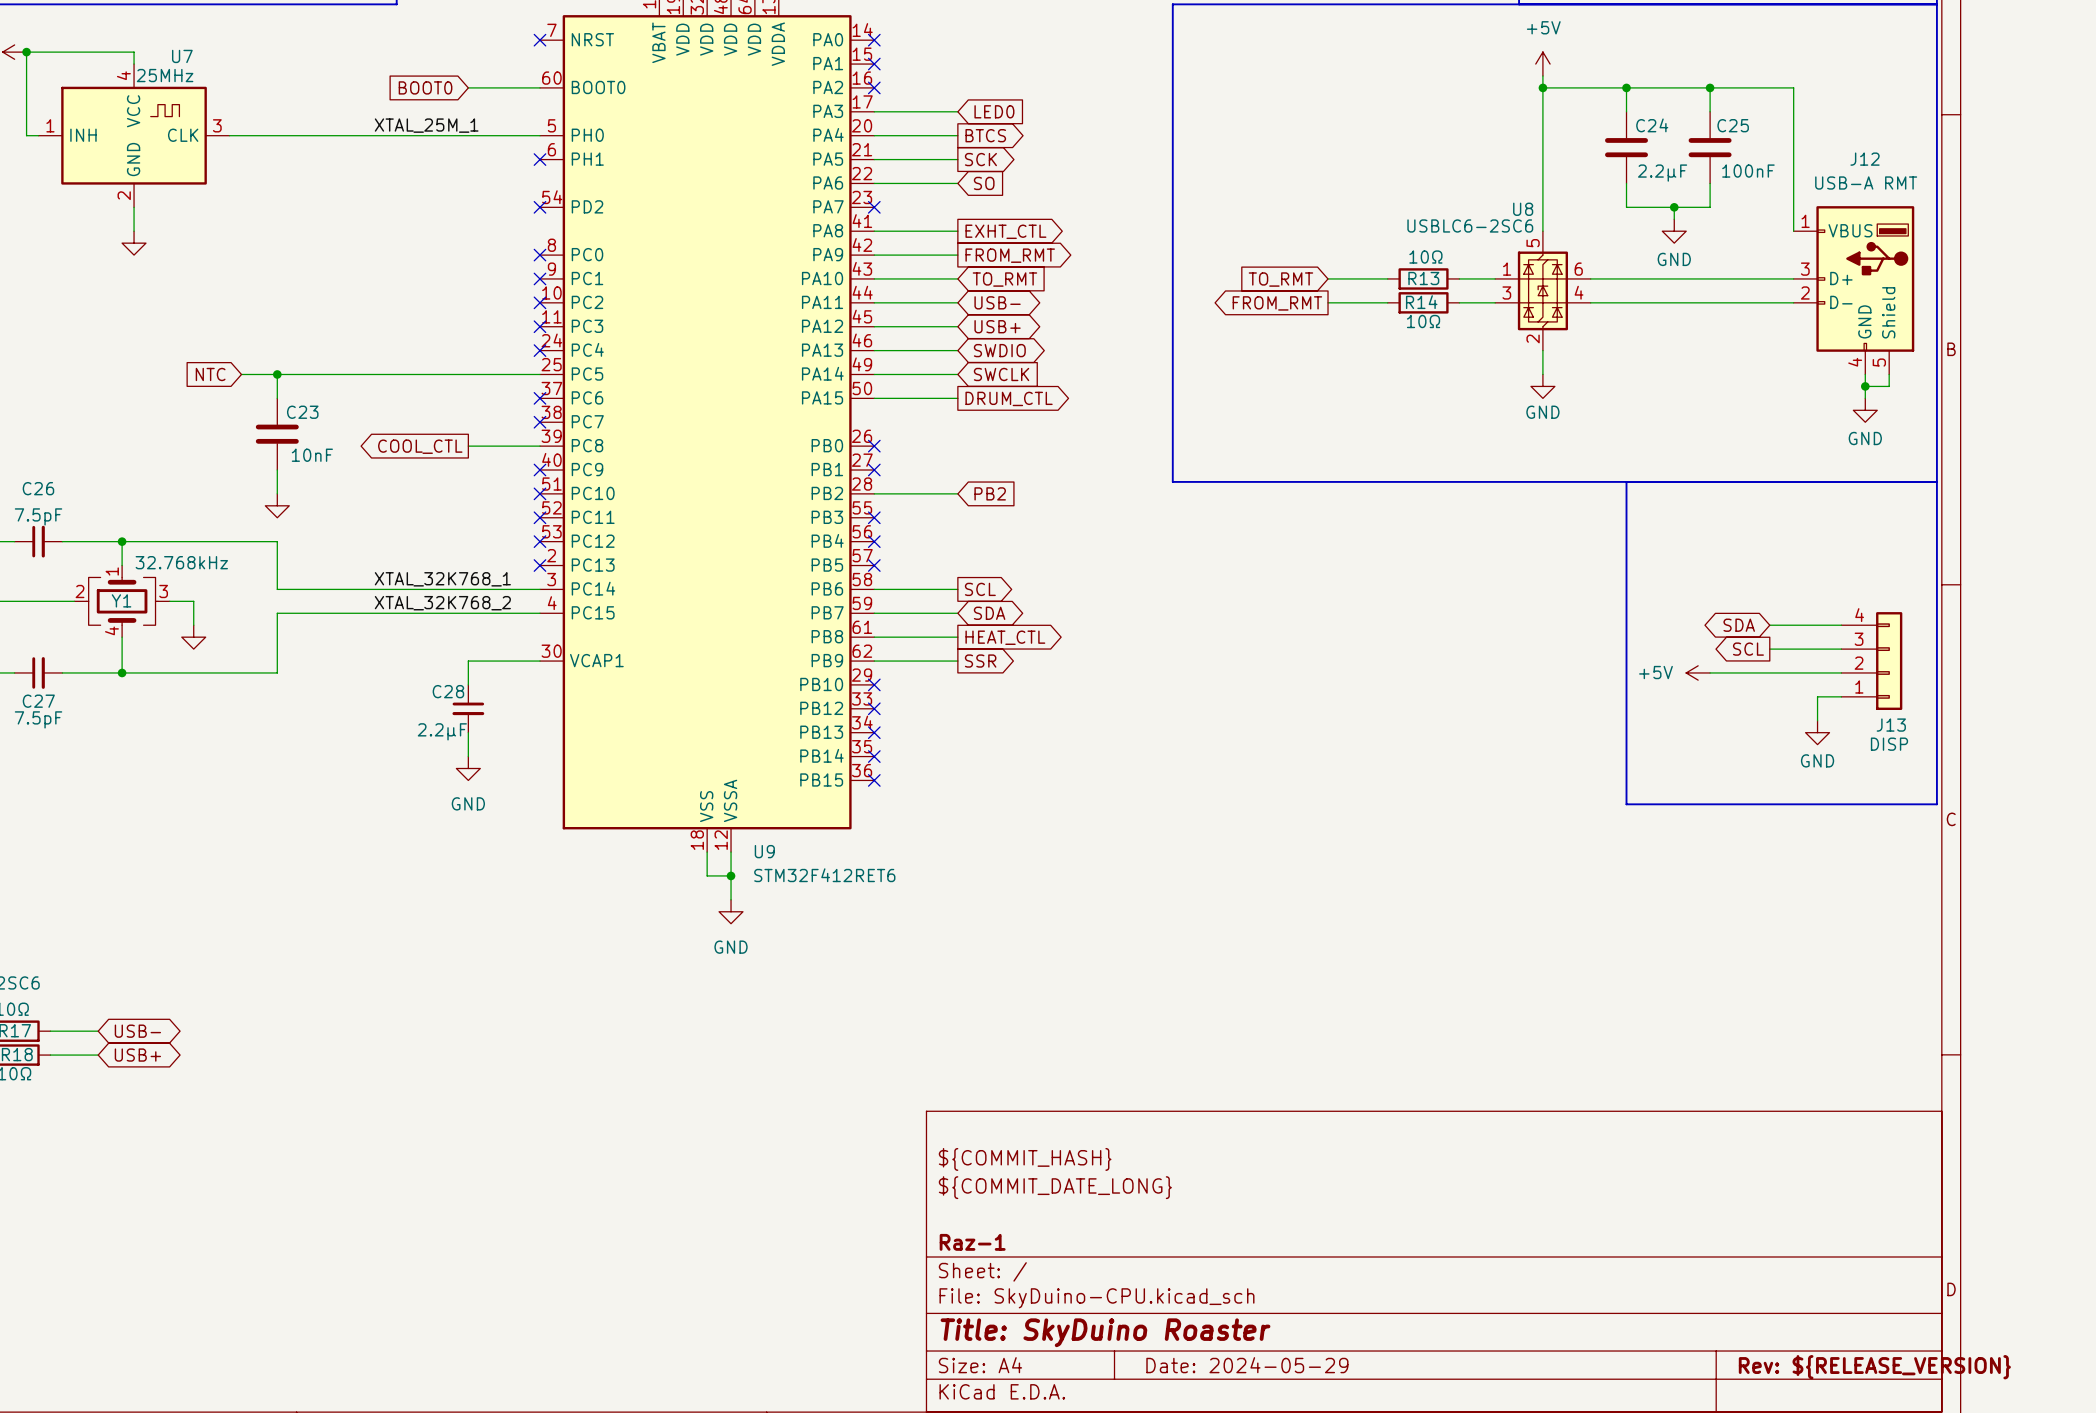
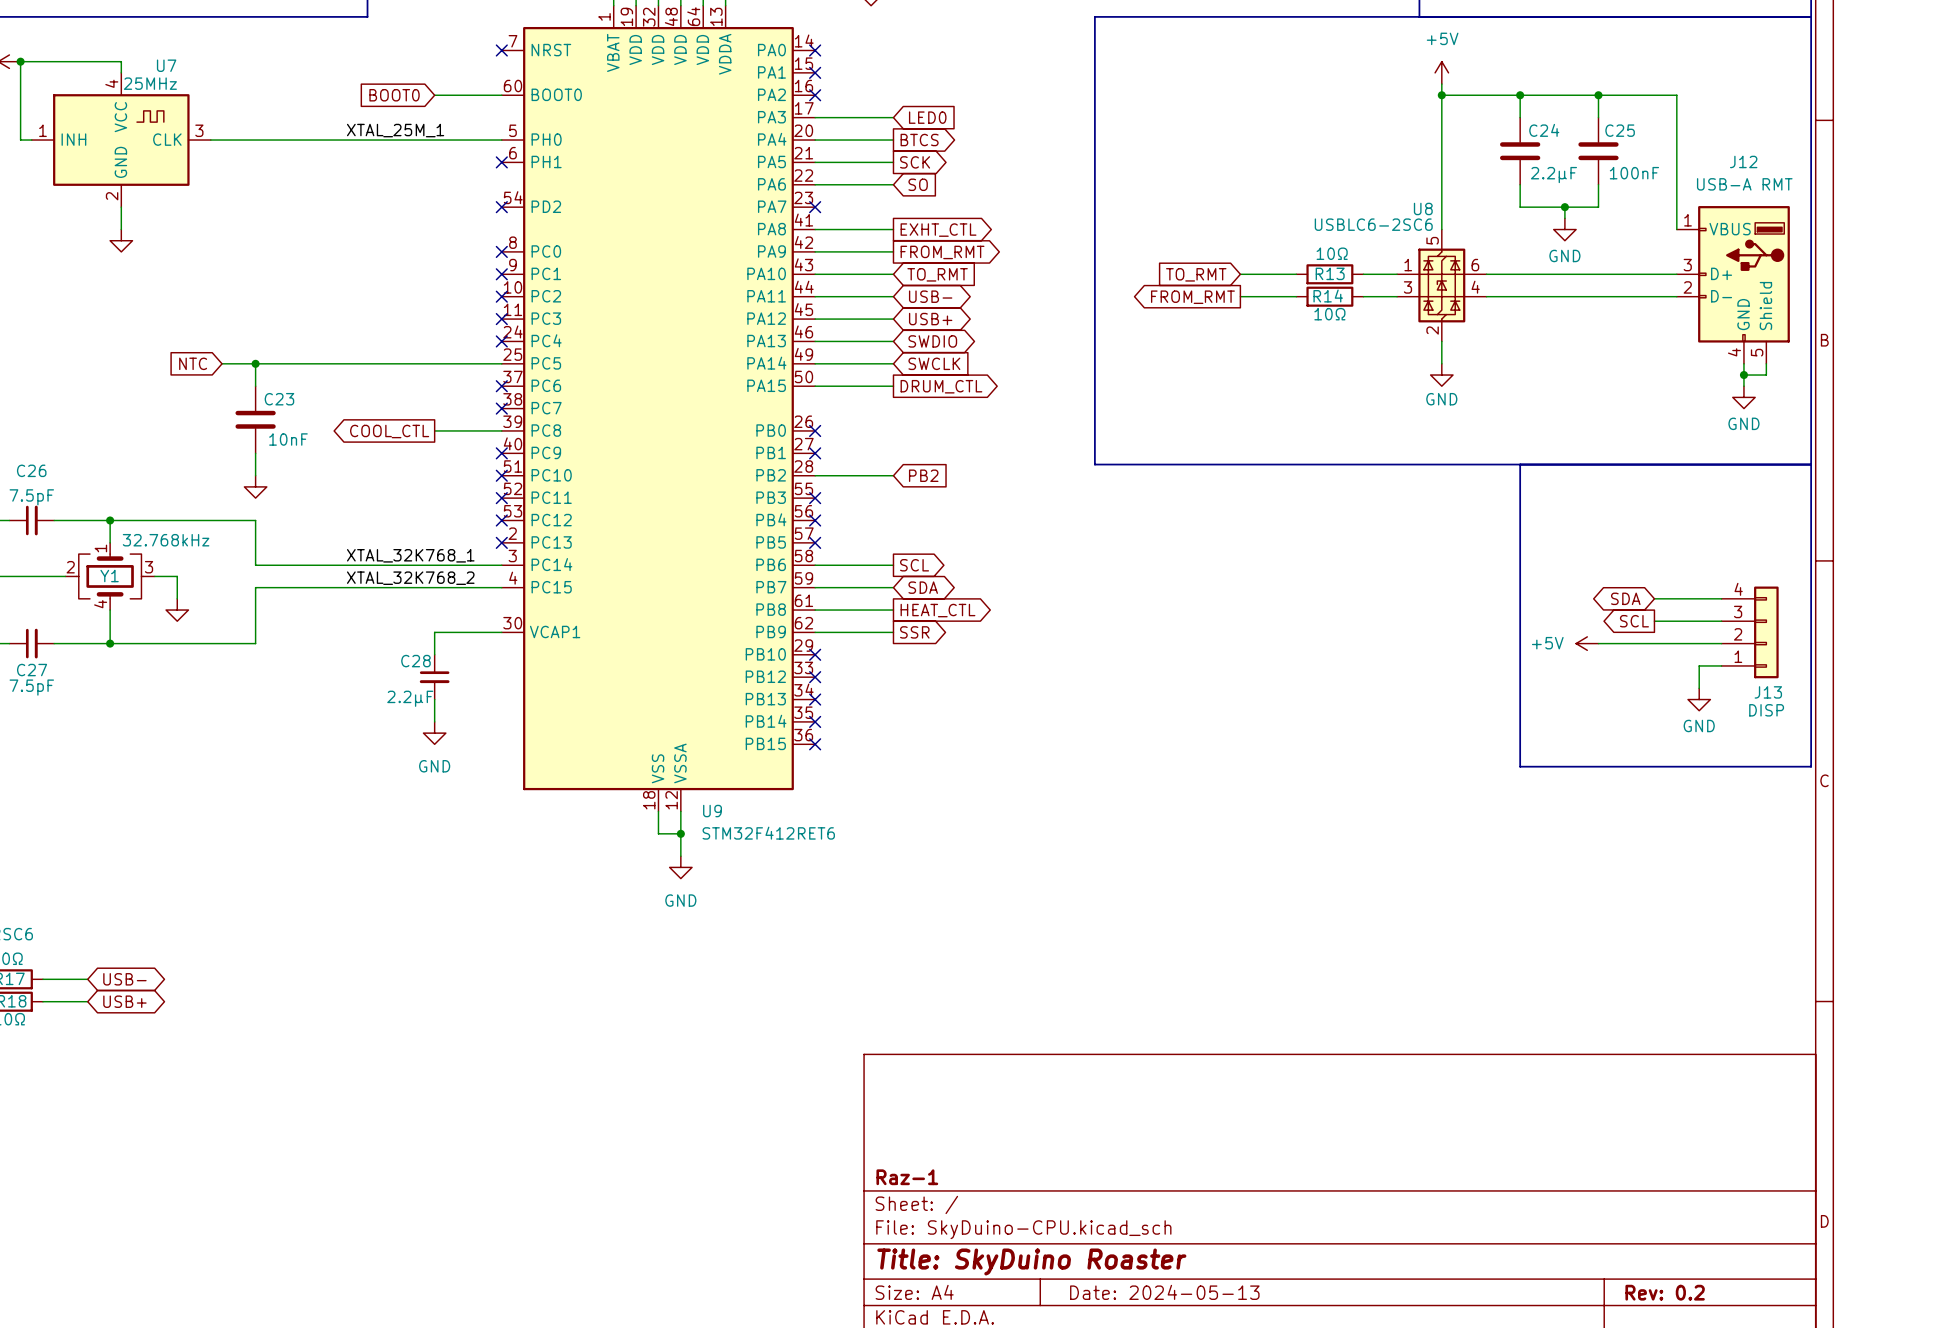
title block: ${COMMIT_HASH} (1025, 1159) -> none
title block: ${COMMIT_DATE_LONG} (1055, 1187) -> none
title block: Date: 2024-05-29 (1247, 1365) -> Date: 2024-05-13 (1164, 1292)
title block: Rev: ${RELEASE_VERSION} (1874, 1367) -> Rev: 0.2 (1665, 1292)

